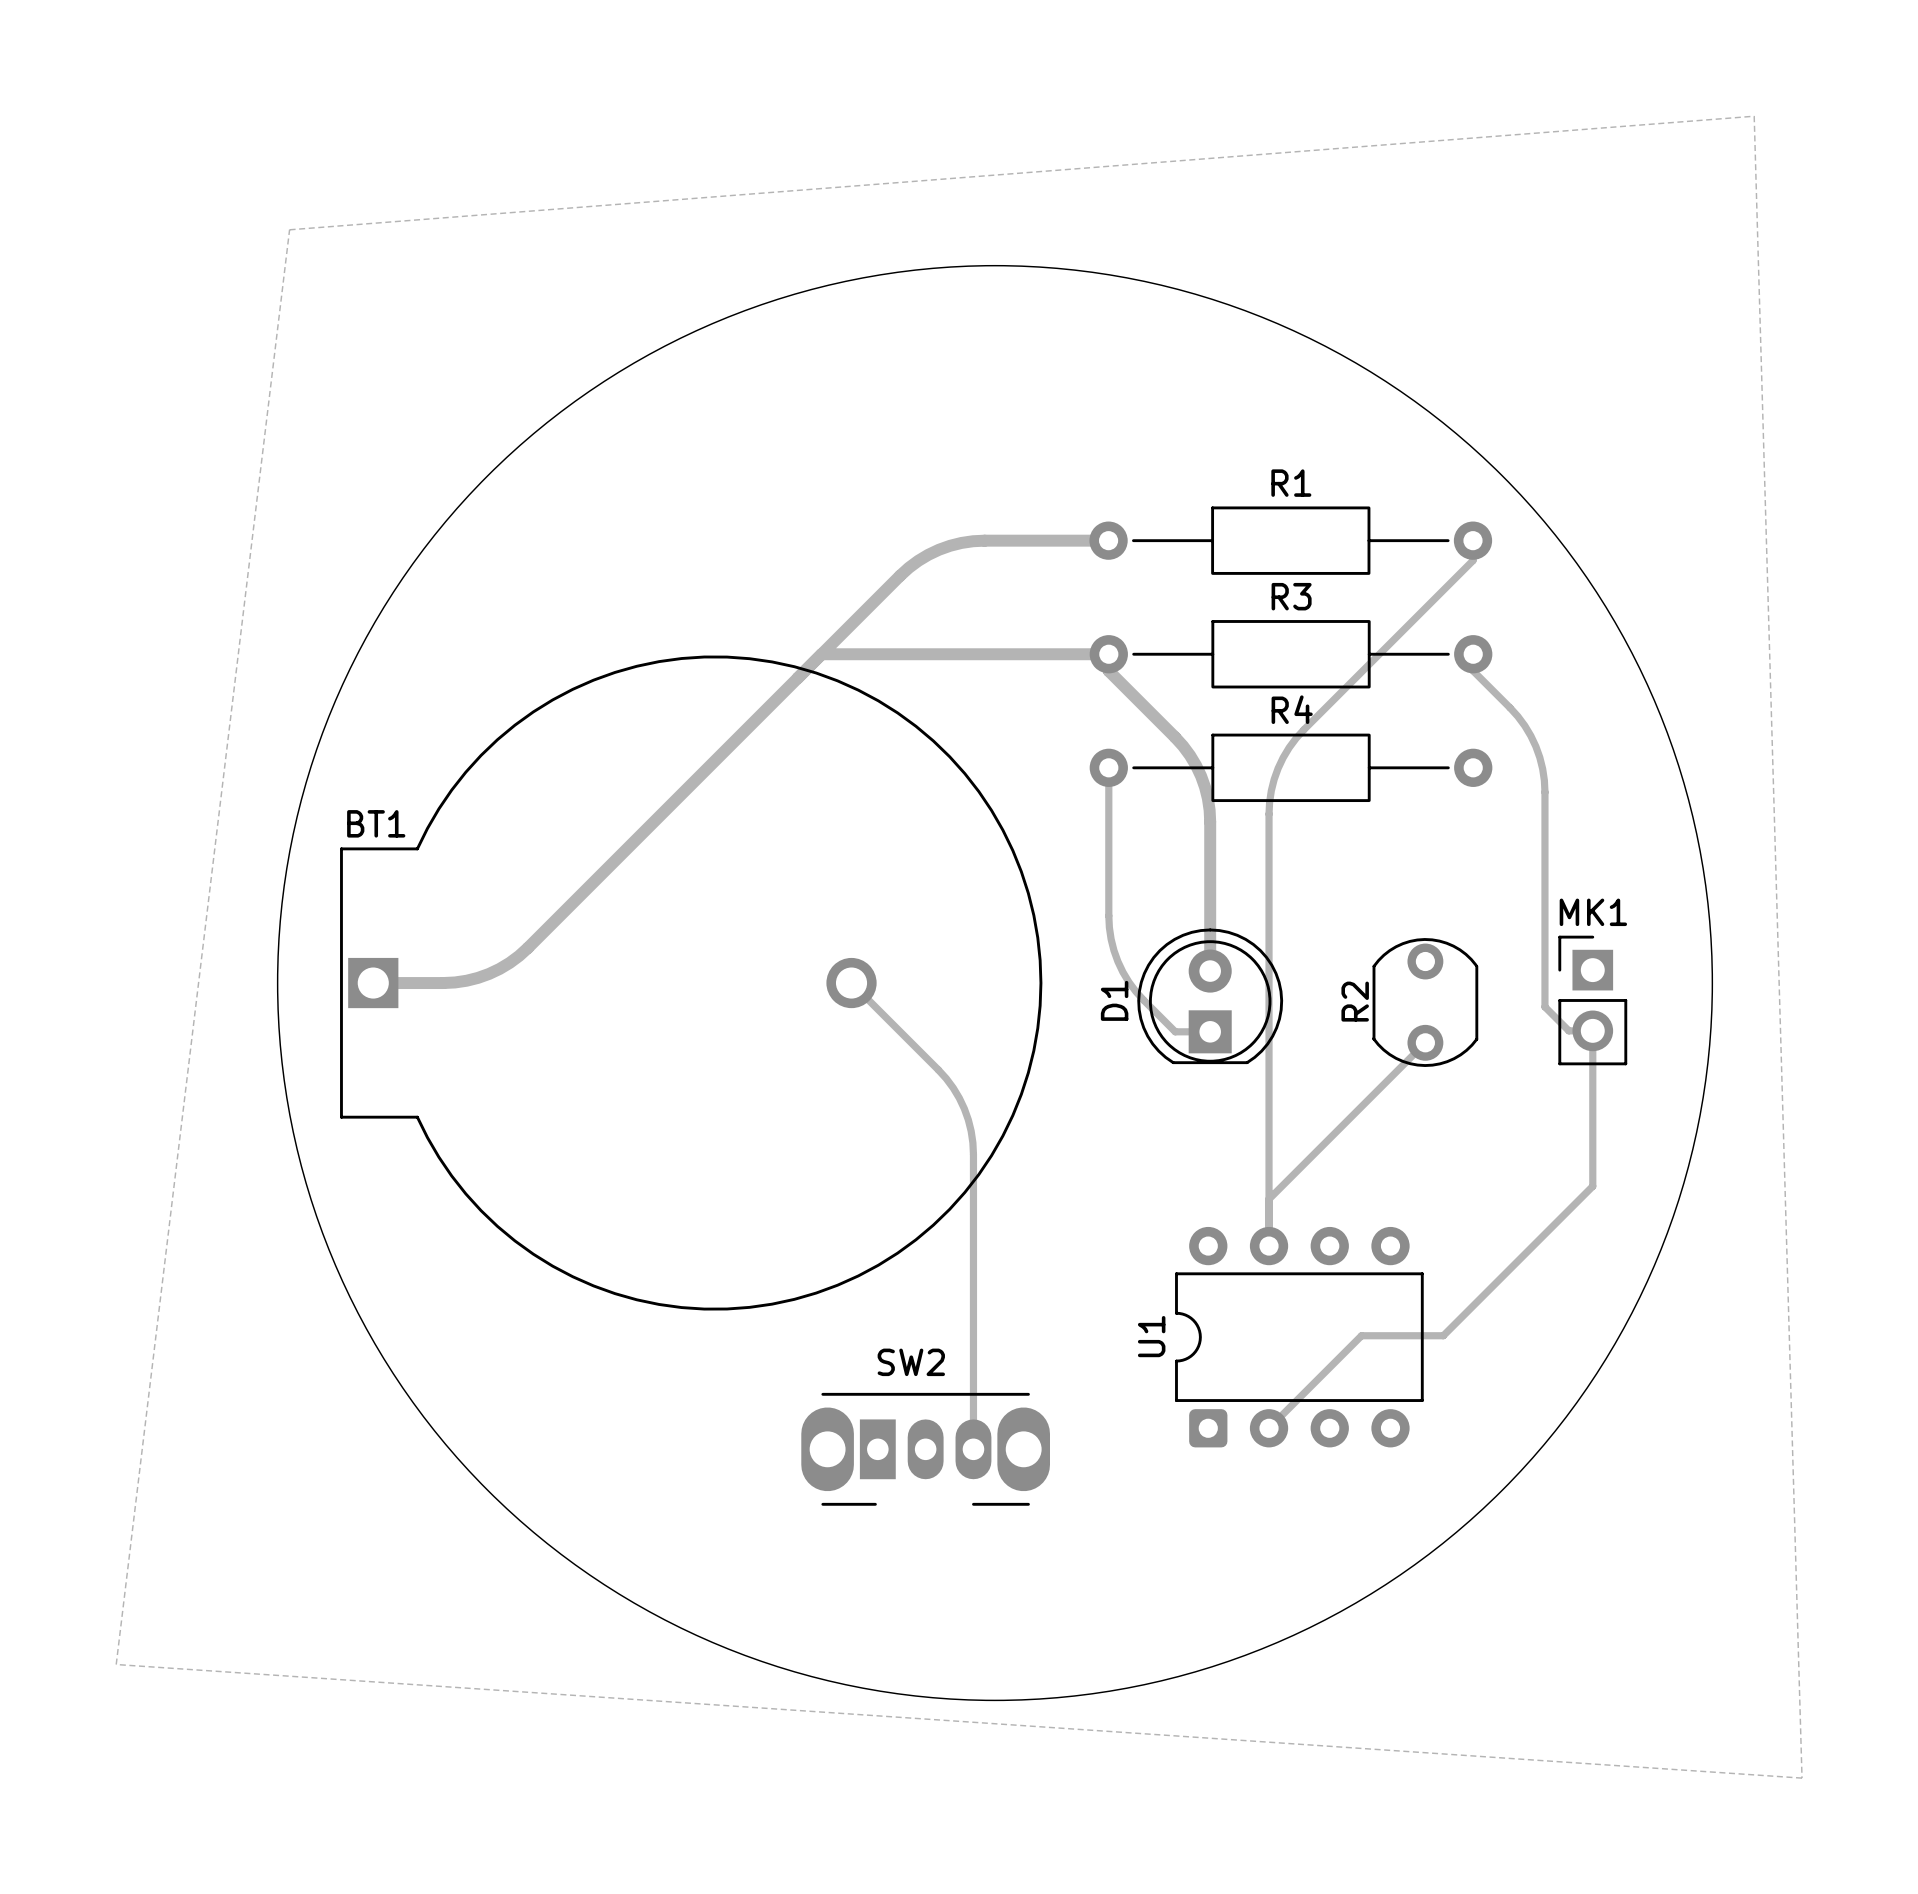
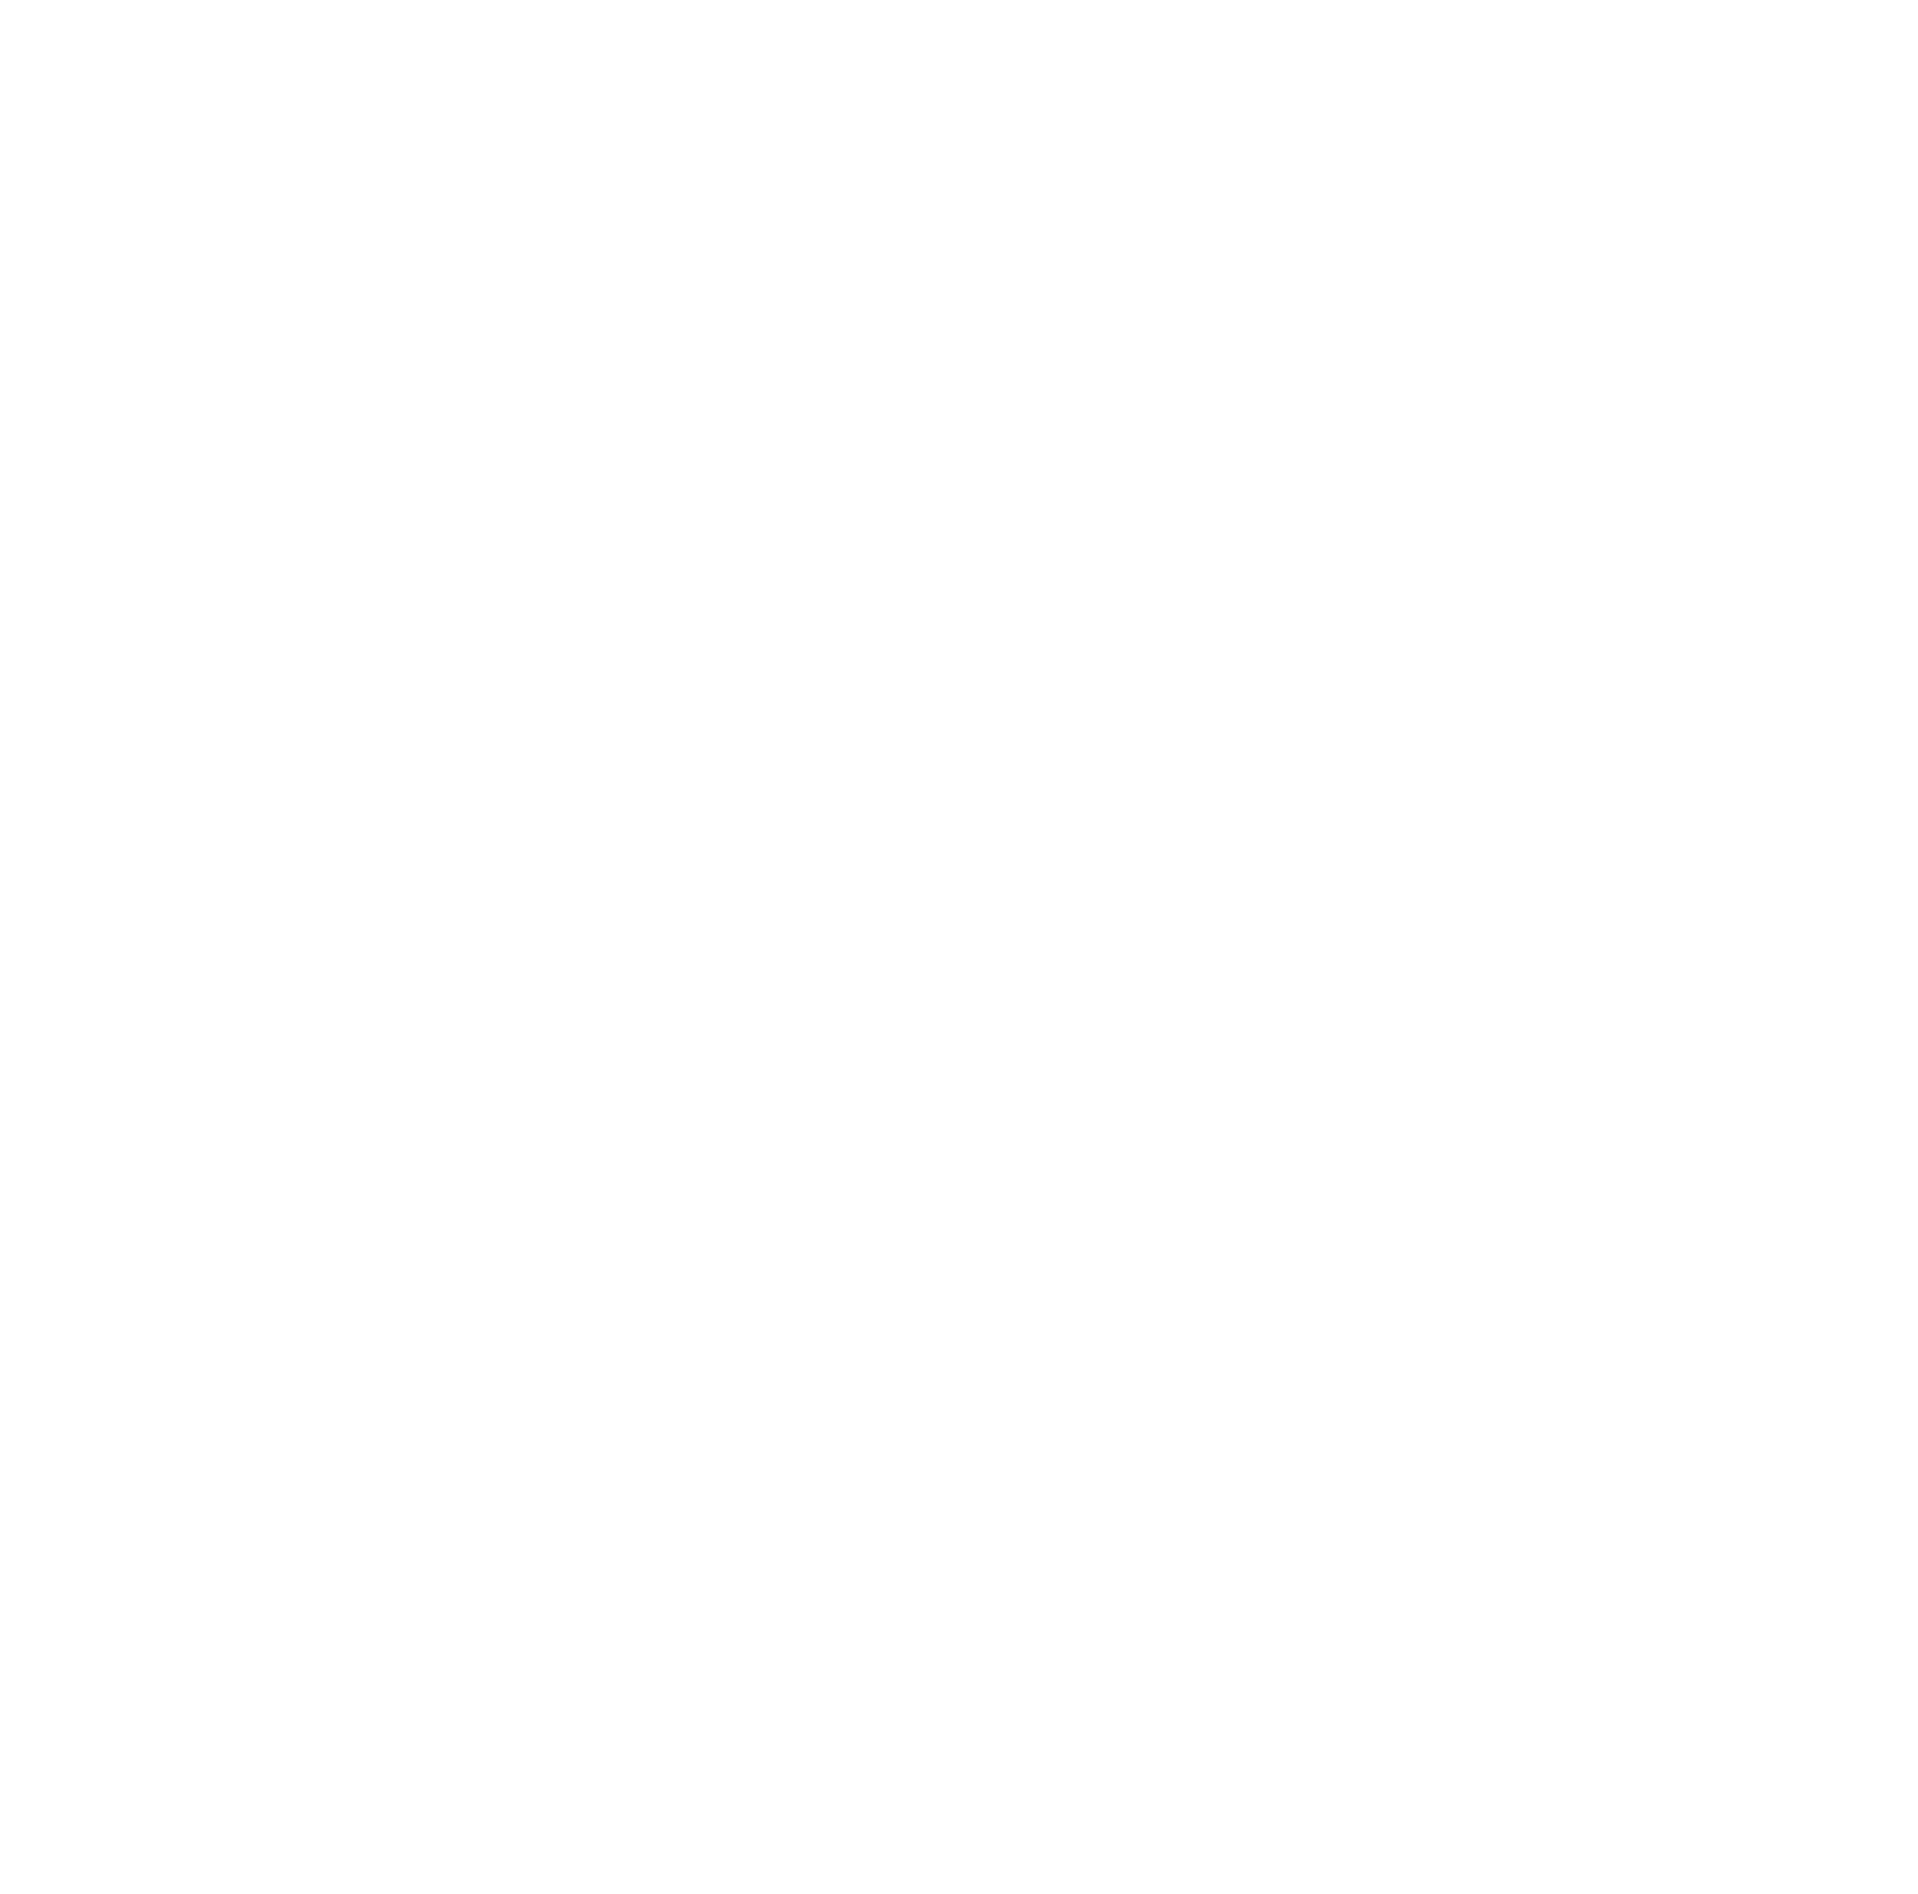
zone outline: (1754, 116) (289, 229) (116, 1664) (1802, 1778) (1754, 116) -> none
round board edge: [277, 265, 1713, 1701] -> none
track: (1108, 540) (973, 541) (950, 545) (918, 560) (900, 575) (519, 955) (499, 968) (466, 980) (443, 983) (373, 983) -> none
R1: (1290, 540) -> none
track: (1472, 540) (1472, 560) (1304, 729) (1289, 747) (1274, 779) (1269, 814) (1269, 1246) -> none
track: (821, 654) (1108, 654) (1108, 670) (1183, 746) (1196, 765) (1205, 787) (1210, 821) (1210, 971) -> none
R3: (1291, 654) -> none
track: (1473, 654) (1473, 670) (1509, 707) (1524, 725) (1535, 746) (1542, 768) (1544, 792) (1544, 1006) (1568, 1030) (1592, 1030) (1592, 1186) (1443, 1335) (1361, 1335) (1269, 1428) -> none
track: (1108, 767) (1108, 915) (1111, 939) (1117, 961) (1135, 991) (1175, 1031) (1210, 1031) -> none
R4: (1291, 767) -> none
BT1: (691, 983) -> none
track: (851, 983) (946, 1078) (959, 1098) (968, 1119) (973, 1154) (973, 1449) -> none
D1: (1210, 996) -> none
MK1: (1592, 1000) -> none
R2: (1425, 1002) -> none
track: (1425, 1042) (1269, 1199) -> none
U1: (1299, 1337) -> none
SW2: (925, 1449) -> none

